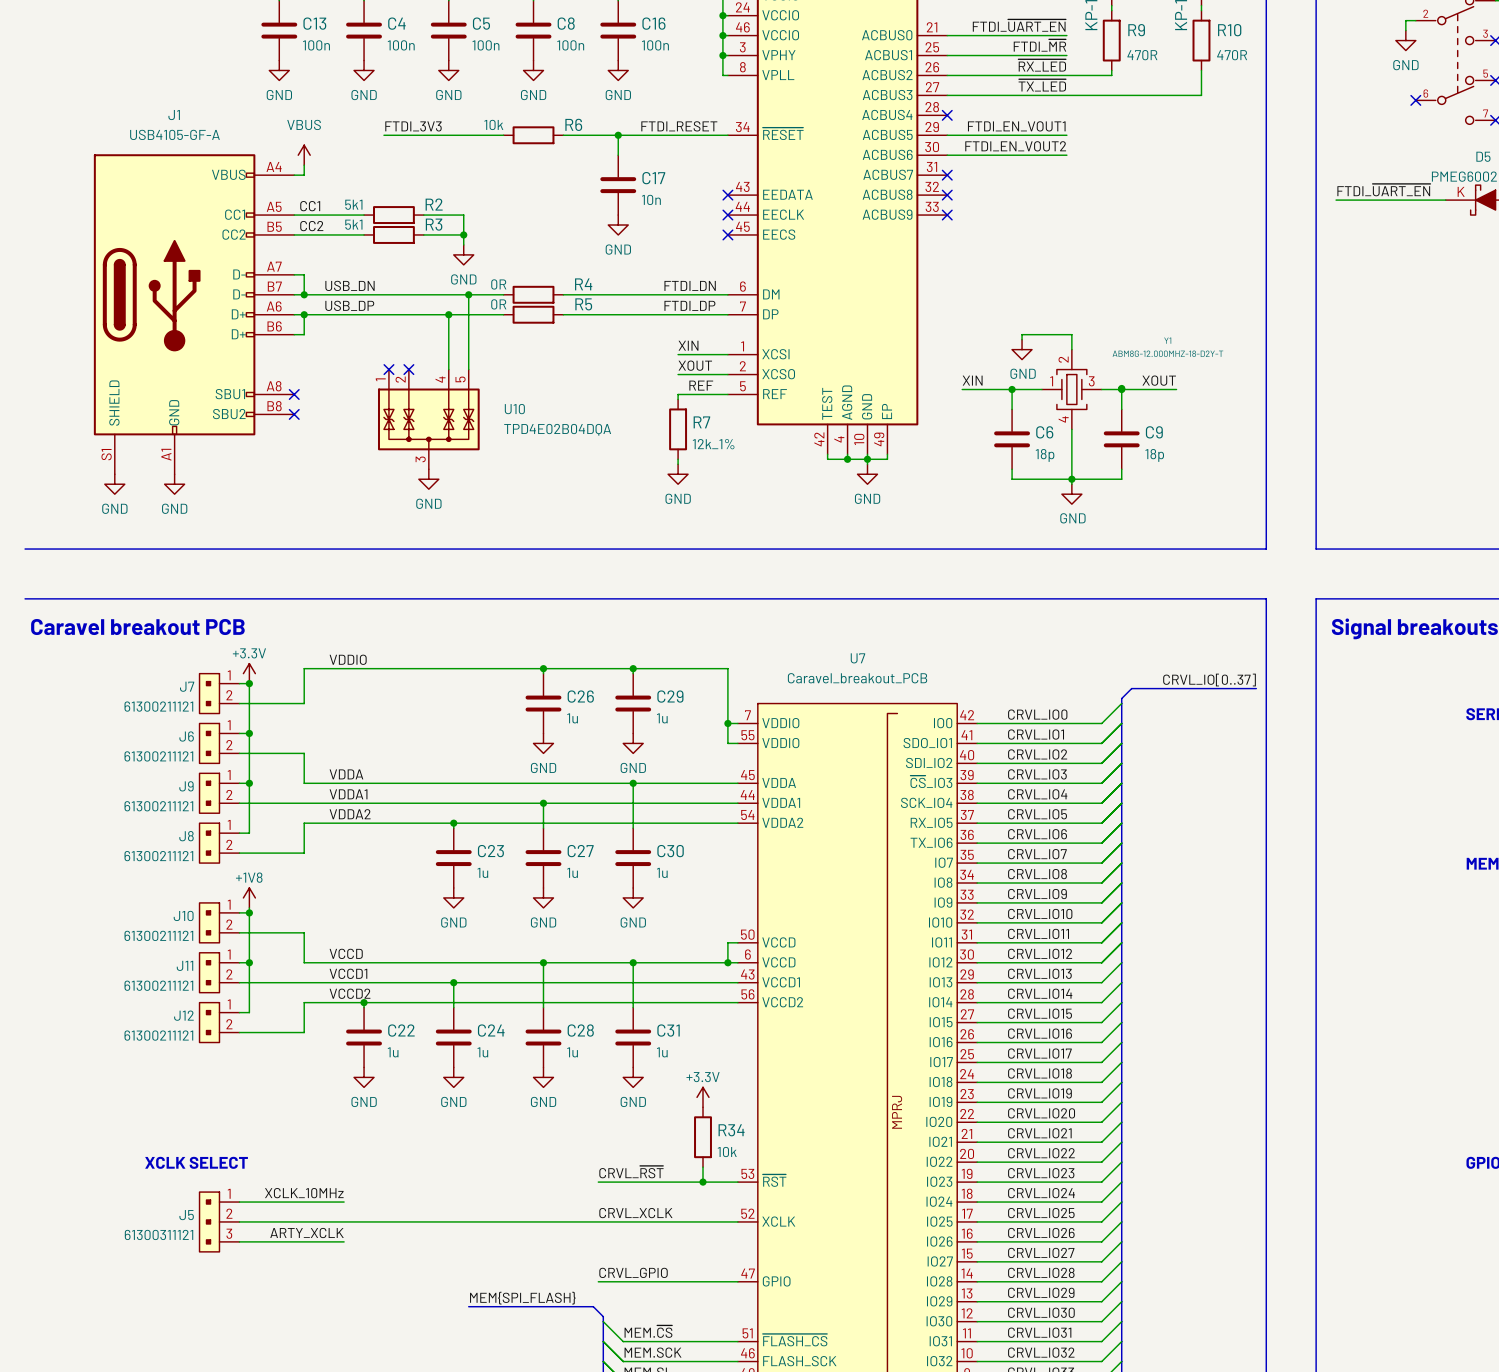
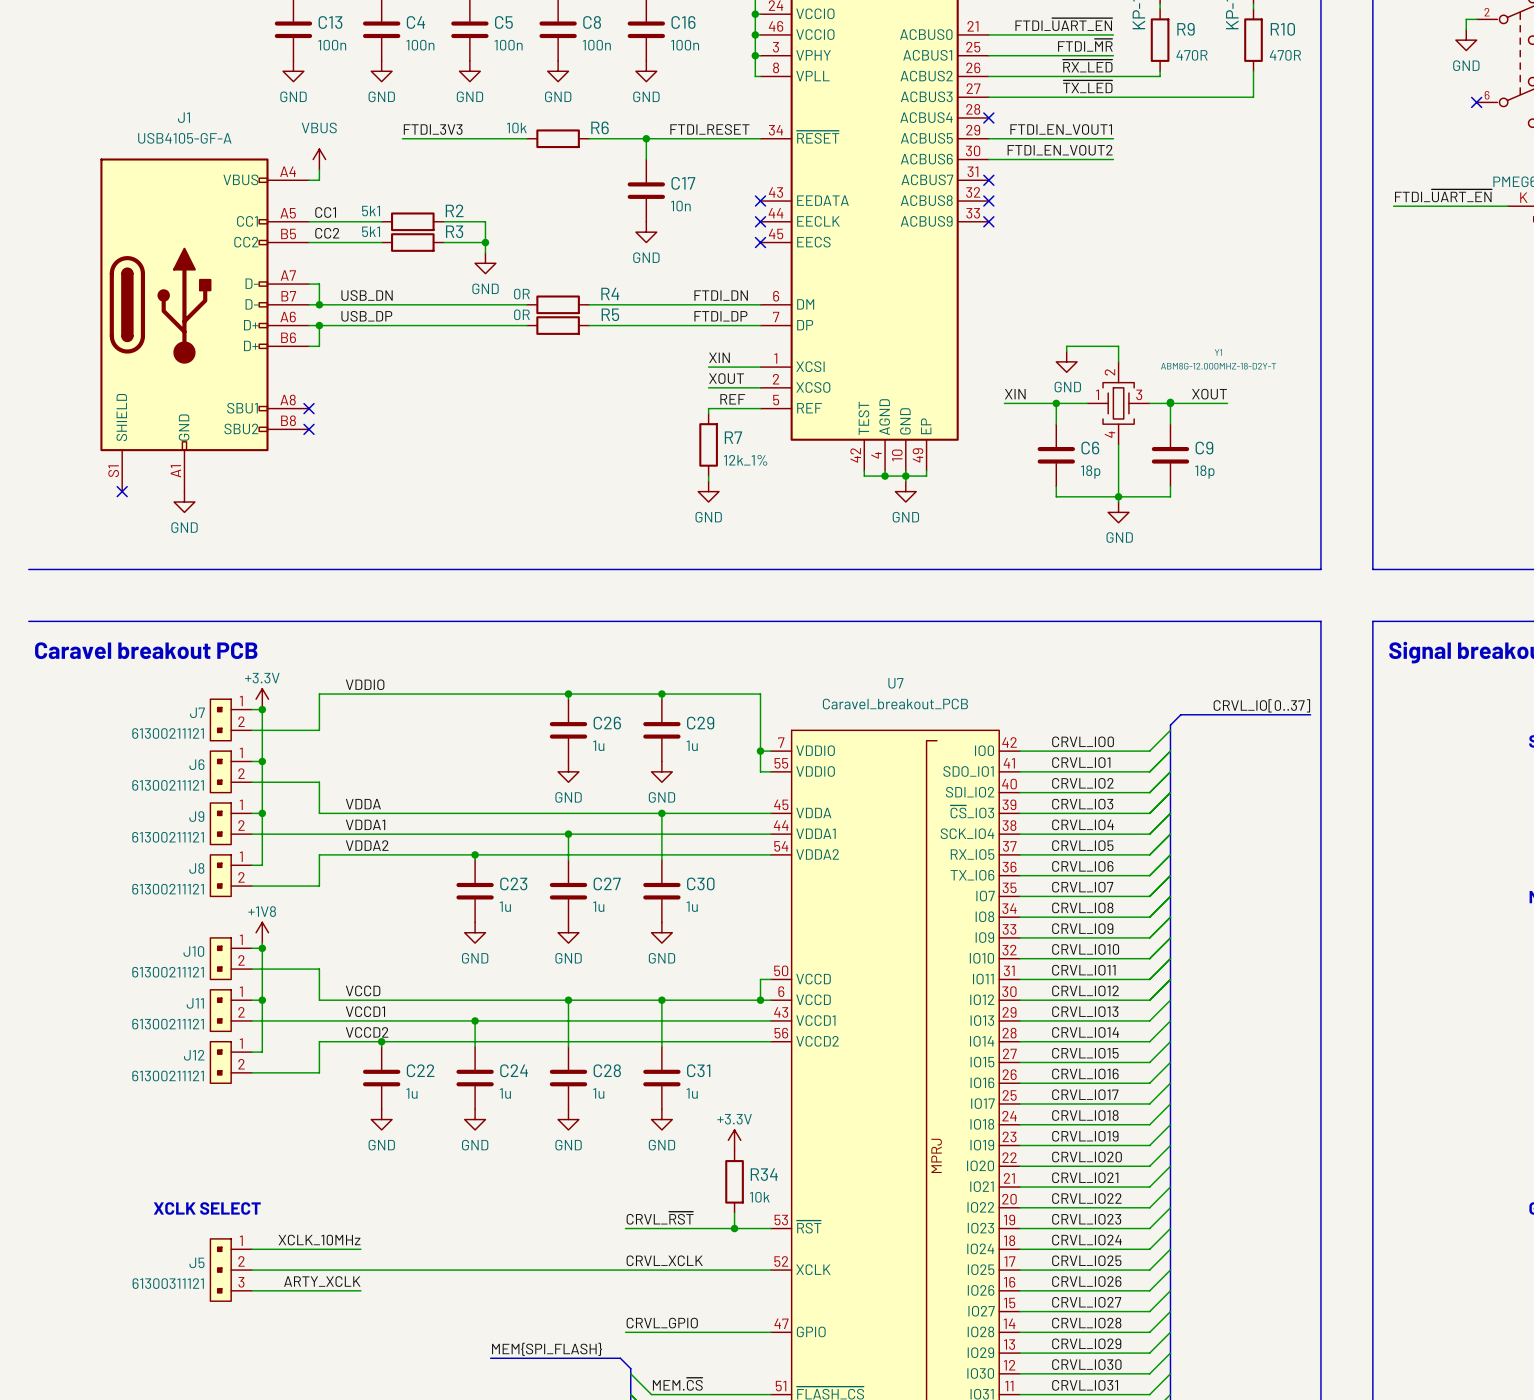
wire: (468, 294) (468, 369) -> none
junction: (468, 294) -> none
wire: (448, 314) (448, 369) -> none
junction: (448, 314) -> none
no-connect mark: (388, 369) -> none
no-connect mark: (408, 369) -> none
U10: TPD4E02B04DQA (428, 419) -> none
no-connect mark: none -> (122, 491)
power symbol: GND (428, 479) -> none
power symbol: GND (114, 484) -> none

